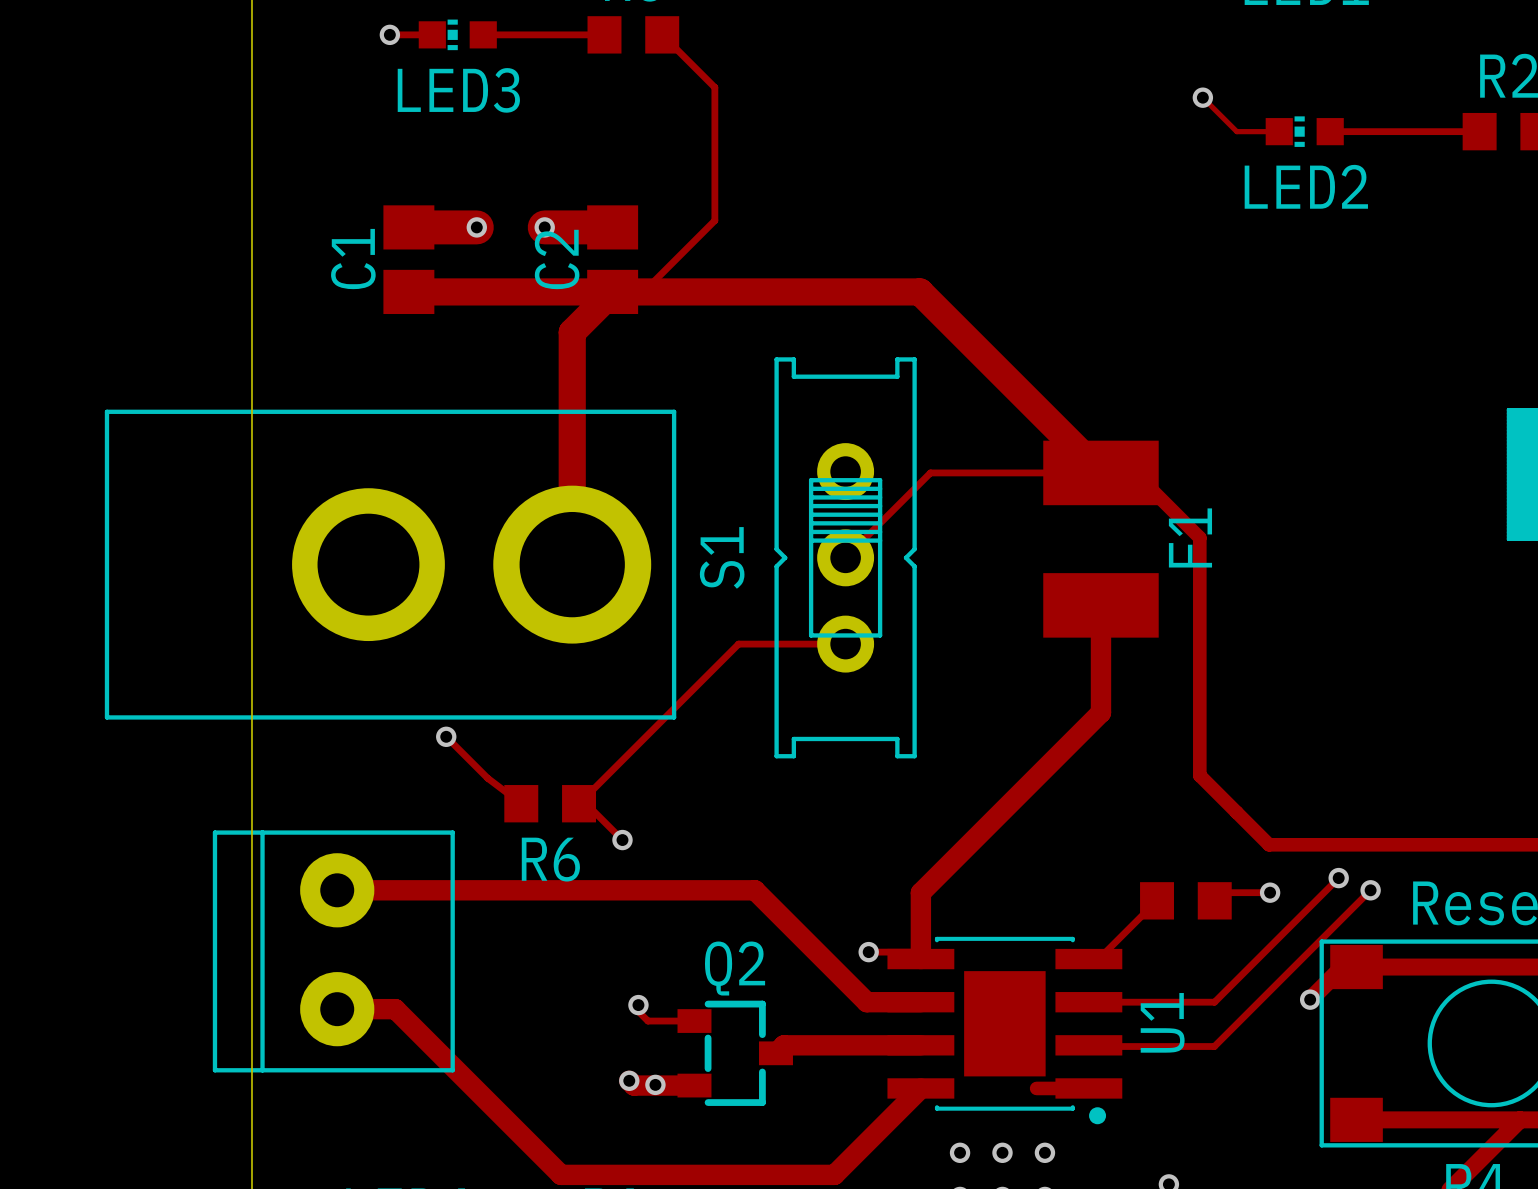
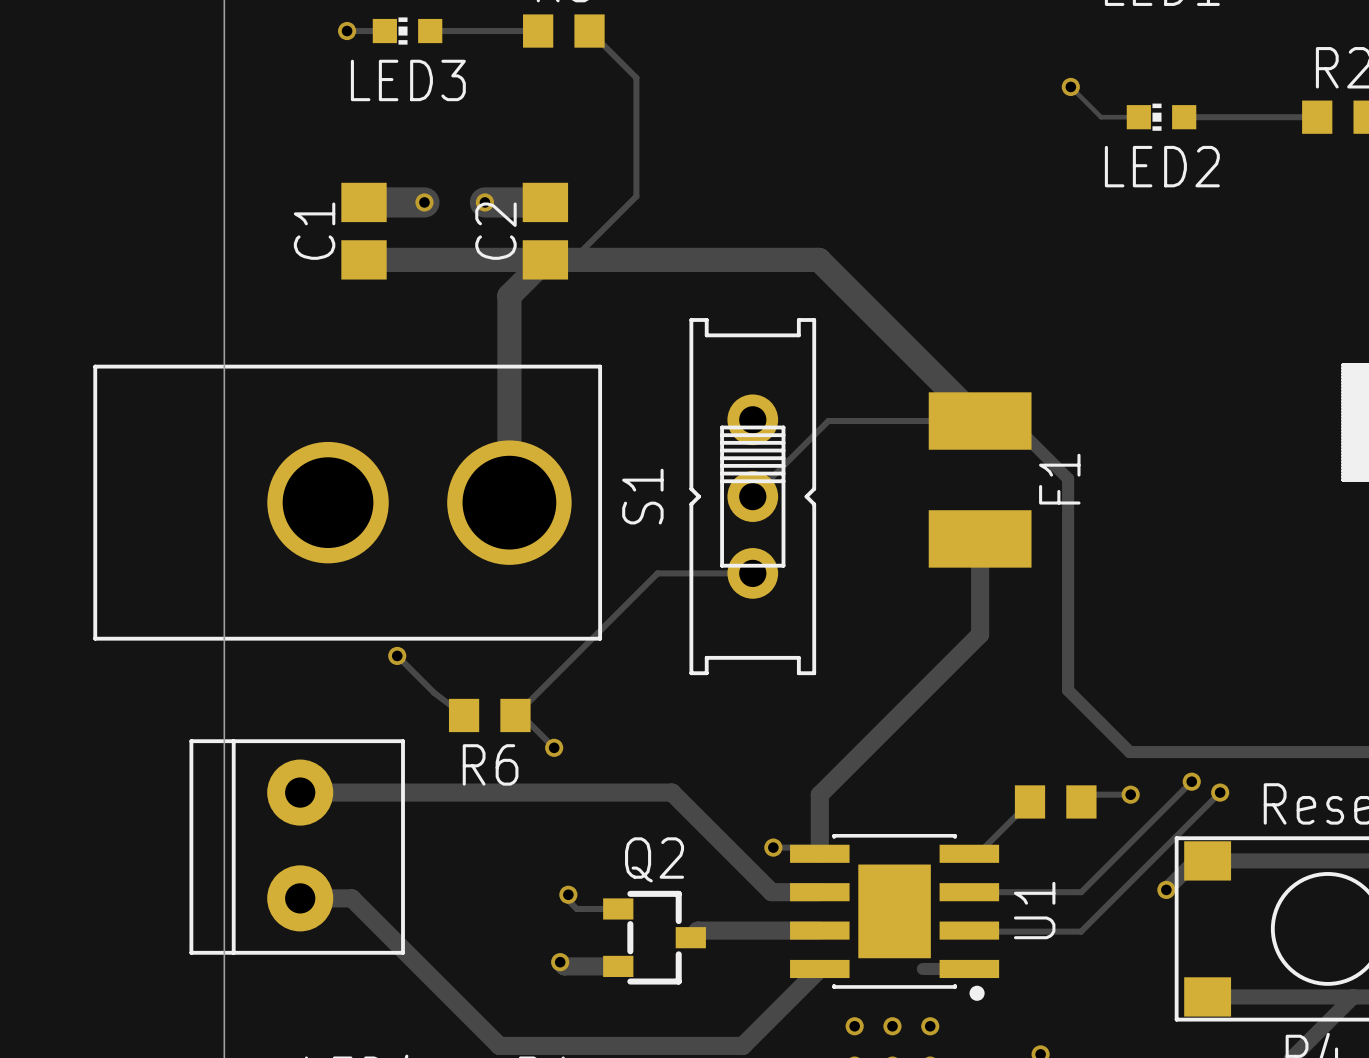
part footprint: [104, 409, 677, 720] -> [93, 364, 603, 641]
via: (655, 1084) -> none

